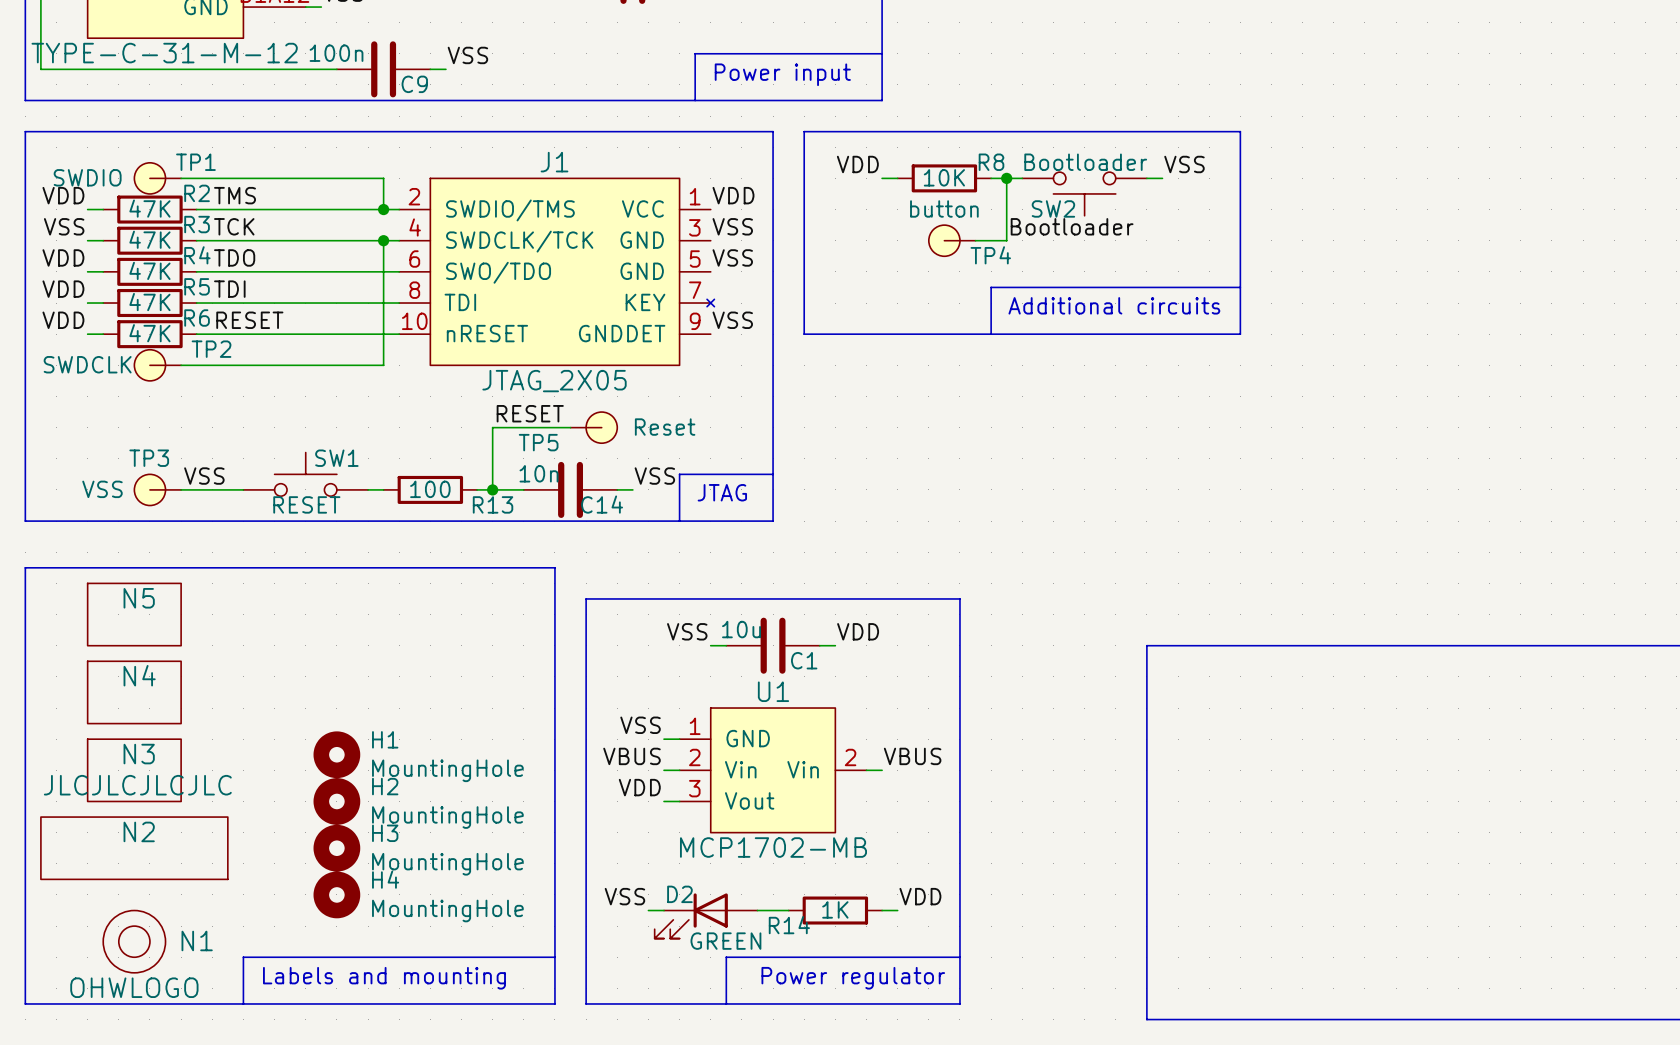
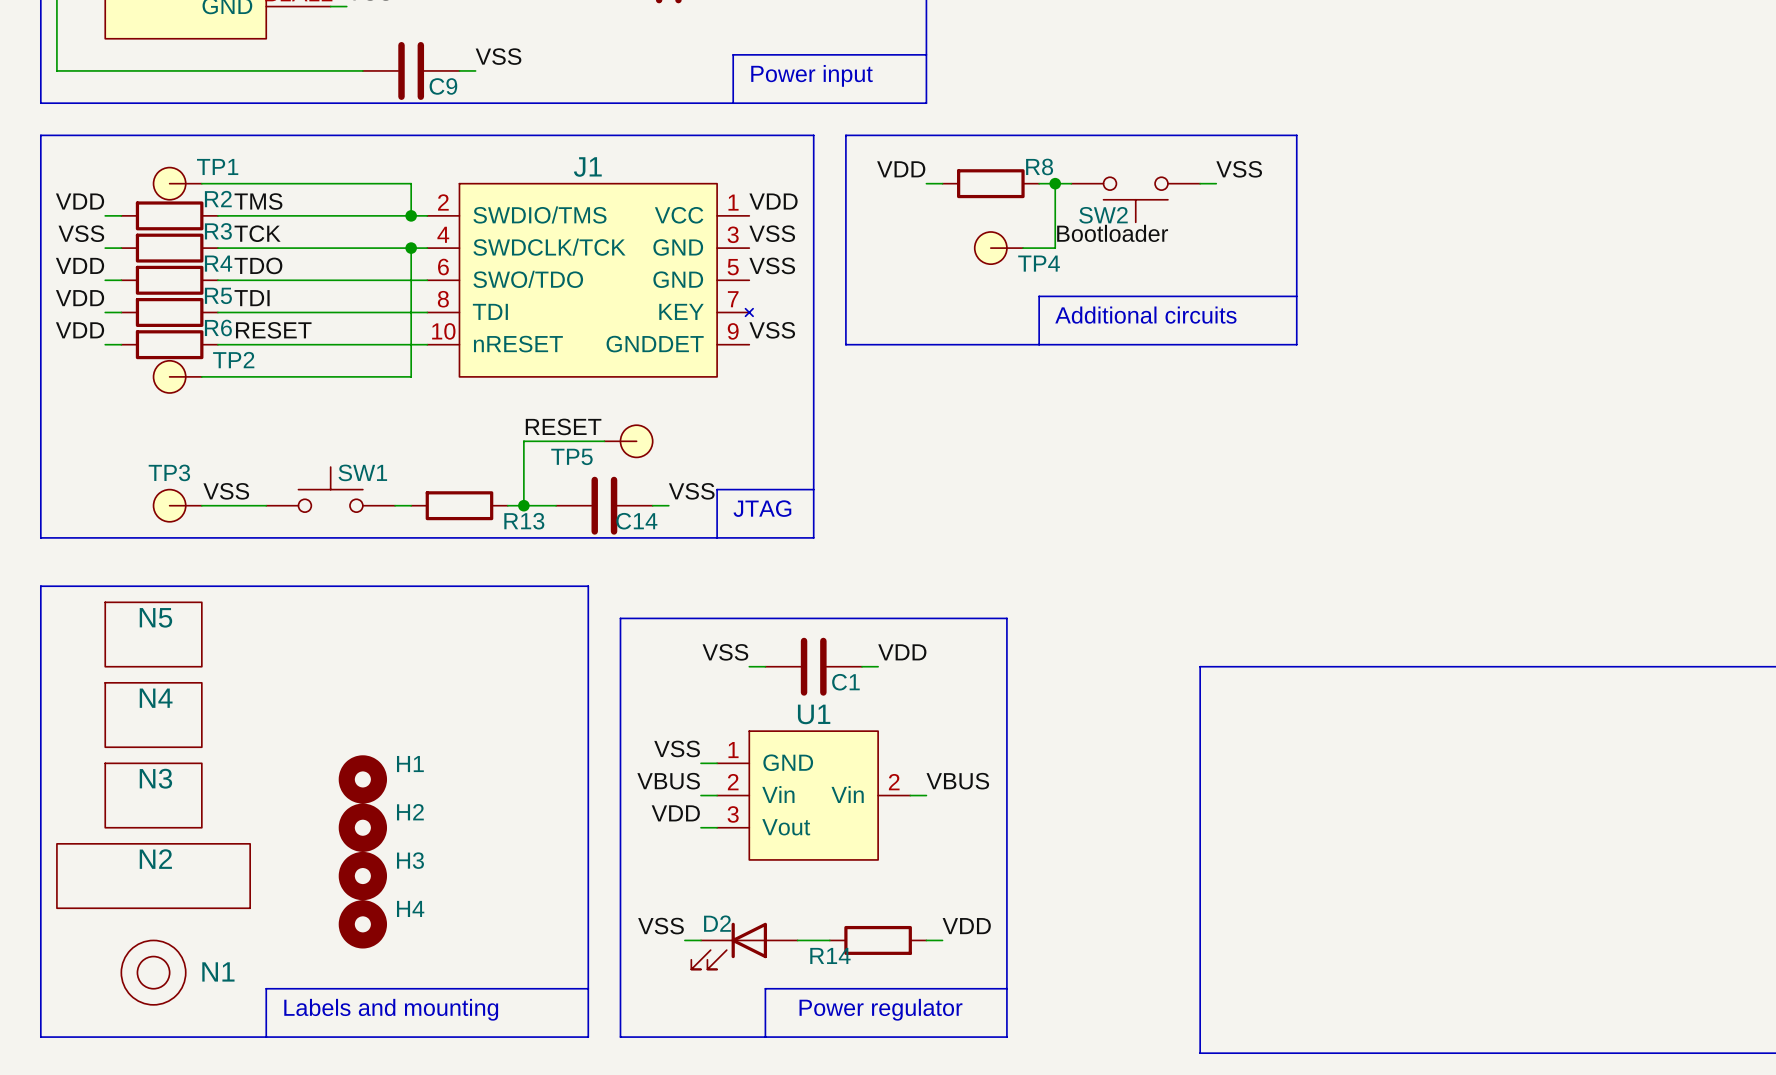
part value: TYPE-C-31-M-12 (164, 53) -> none
C9 value: 100n (336, 53) -> none
SW2 value: Bootloader (1085, 162) -> none
TP1 value: SWDIO (87, 177) -> none
R8 value: 10K (944, 177) -> none
R2 value: 47K (149, 208) -> none
TP4 value: button (944, 208) -> none
R3 value: 47K (149, 239) -> none
R4 value: 47K (149, 270) -> none
R5 value: 47K (149, 302) -> none
R6 value: 47K (149, 333) -> none
TP2 value: SWDCLK (87, 364) -> none
J1 value: JTAG_2X05 (554, 381) -> none
TP5 value: Reset (665, 427) -> none
C14 value: 10n (539, 473) -> none
TP3 value: VSS (102, 489) -> none
R13 value: 100 (430, 489) -> none
SW1 value: RESET (306, 504) -> none
C1 value: 10u (741, 629) -> none
H1 value: MountingHole (447, 770) -> none
N3 value: JLCJLCJLCJLC (137, 785) -> none
H2 value: MountingHole (447, 817) -> none
U1 value: MCP1702-MB (773, 847) -> none
H3 value: MountingHole (447, 864) -> none
R14 value: 1K (835, 909) -> none
H4 value: MountingHole (447, 910) -> none
D2 value: GREEN (725, 941) -> none
N1 value: OHWLOGO (134, 987) -> none

